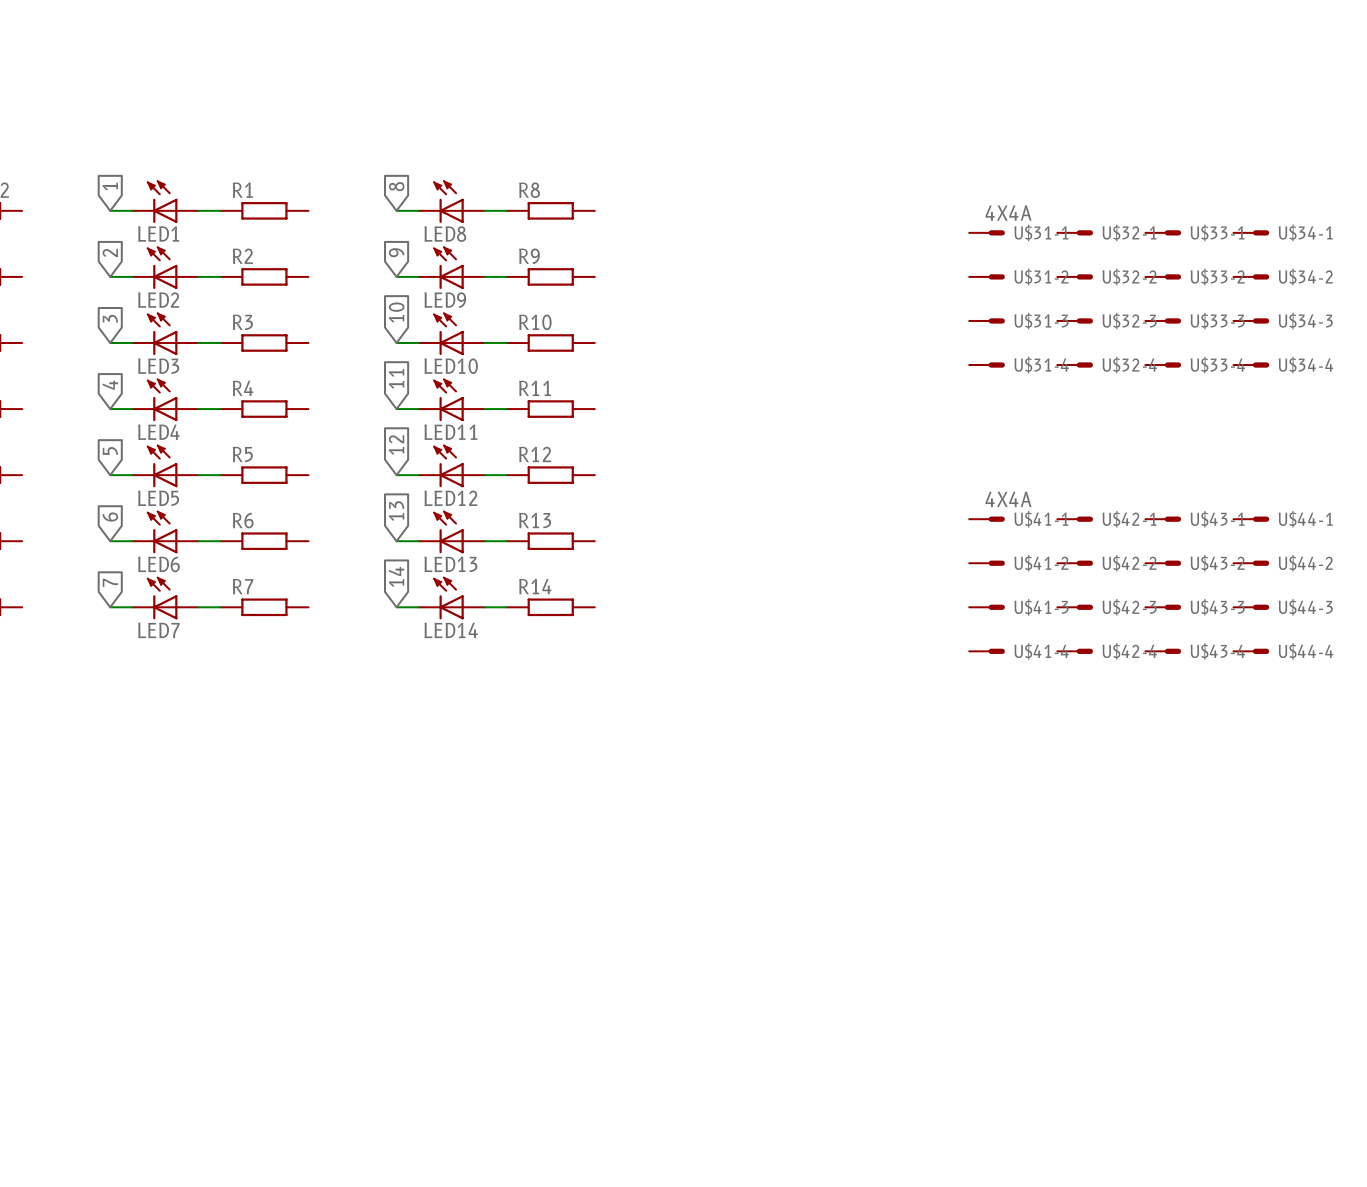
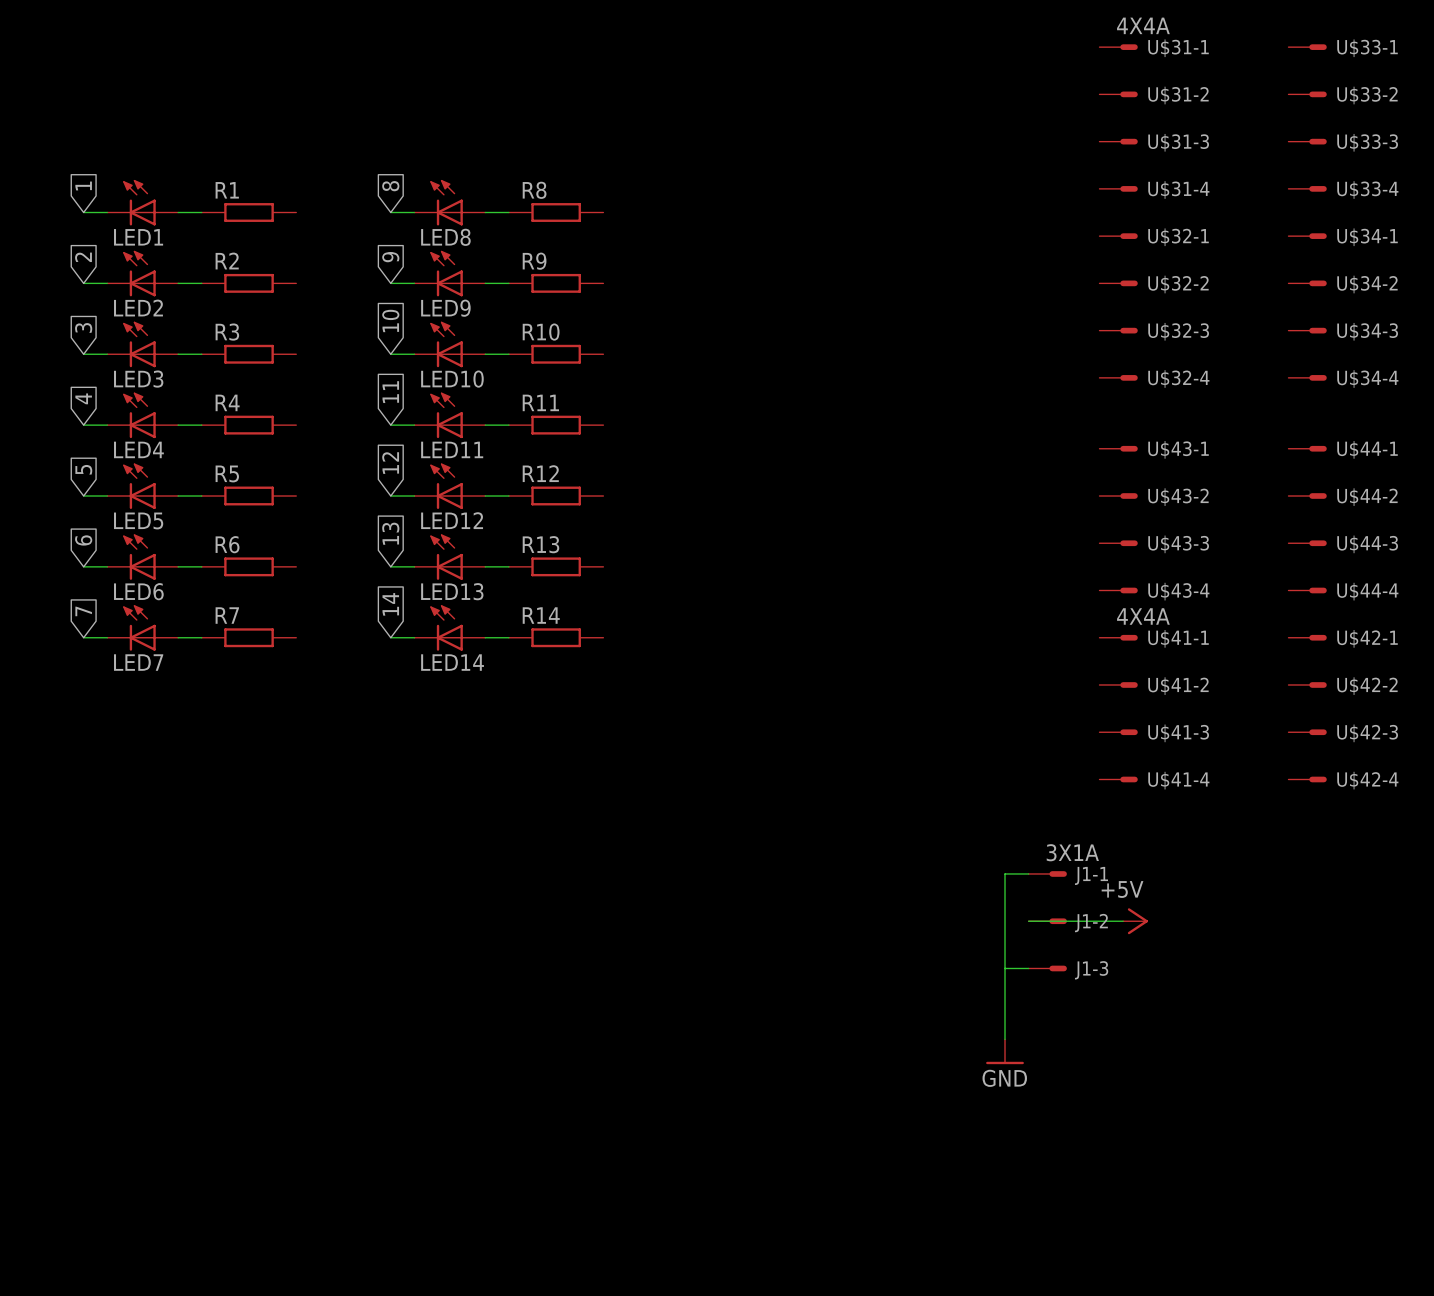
U$31-1 position: (987, 232) -> (1118, 47)
U$33-1 position: (1163, 232) -> (1307, 47)
U$31-2 position: (987, 276) -> (1118, 94)
U$33-2 position: (1163, 276) -> (1307, 94)
U$31-3 position: (987, 320) -> (1118, 141)
U$33-3 position: (1163, 320) -> (1307, 141)
U$31-4 position: (987, 365) -> (1118, 188)
U$33-4 position: (1163, 365) -> (1307, 188)
U$44-1: none -> (1307, 448)
U$44-2: none -> (1307, 496)
U$41-1: 4X4A (987, 519) -> none
U$42-1 name: U$42-1 (1129, 519) -> U$43-3 (1178, 544)
U$43-1 position: (1163, 519) -> (1118, 448)
U$44-1 name: U$44-1 (1305, 519) -> U$44-3 (1367, 544)
U$41-2: (987, 563) -> none
U$42-2 name: U$42-2 (1129, 563) -> U$43-4 (1178, 591)
U$43-2 position: (1163, 563) -> (1118, 496)
U$44-2 name: U$44-2 (1305, 563) -> U$44-4 (1367, 591)
U$42-3 value: none -> 4X4A (1143, 616)
U$41-3 position: (987, 607) -> (1118, 732)
U$42-3 name: U$42-3 (1129, 607) -> U$41-1 (1178, 638)
U$43-3: (1163, 607) -> none
U$44-3 name: U$44-3 (1305, 607) -> U$42-1 (1367, 638)
U$41-4 position: (987, 651) -> (1118, 779)
U$42-4 name: U$42-4 (1129, 651) -> U$41-2 (1178, 686)
U$43-4: (1163, 651) -> none
U$44-4 name: U$44-4 (1305, 651) -> U$42-2 (1367, 686)
U$42-3: none -> (1307, 732)
U$42-4: none -> (1307, 779)
wire: none -> (1028, 873) (1005, 873) (1005, 1039)
J1-1: none -> 3X1A (1047, 873)
wire: none -> (1028, 921) (1123, 921)
J1-2: none -> (1047, 921)
power symbol: none -> +5V (1135, 921)
wire: none -> (1005, 968) (1028, 968)
J1-3: none -> (1047, 968)
power symbol: none -> GND (1005, 1051)

